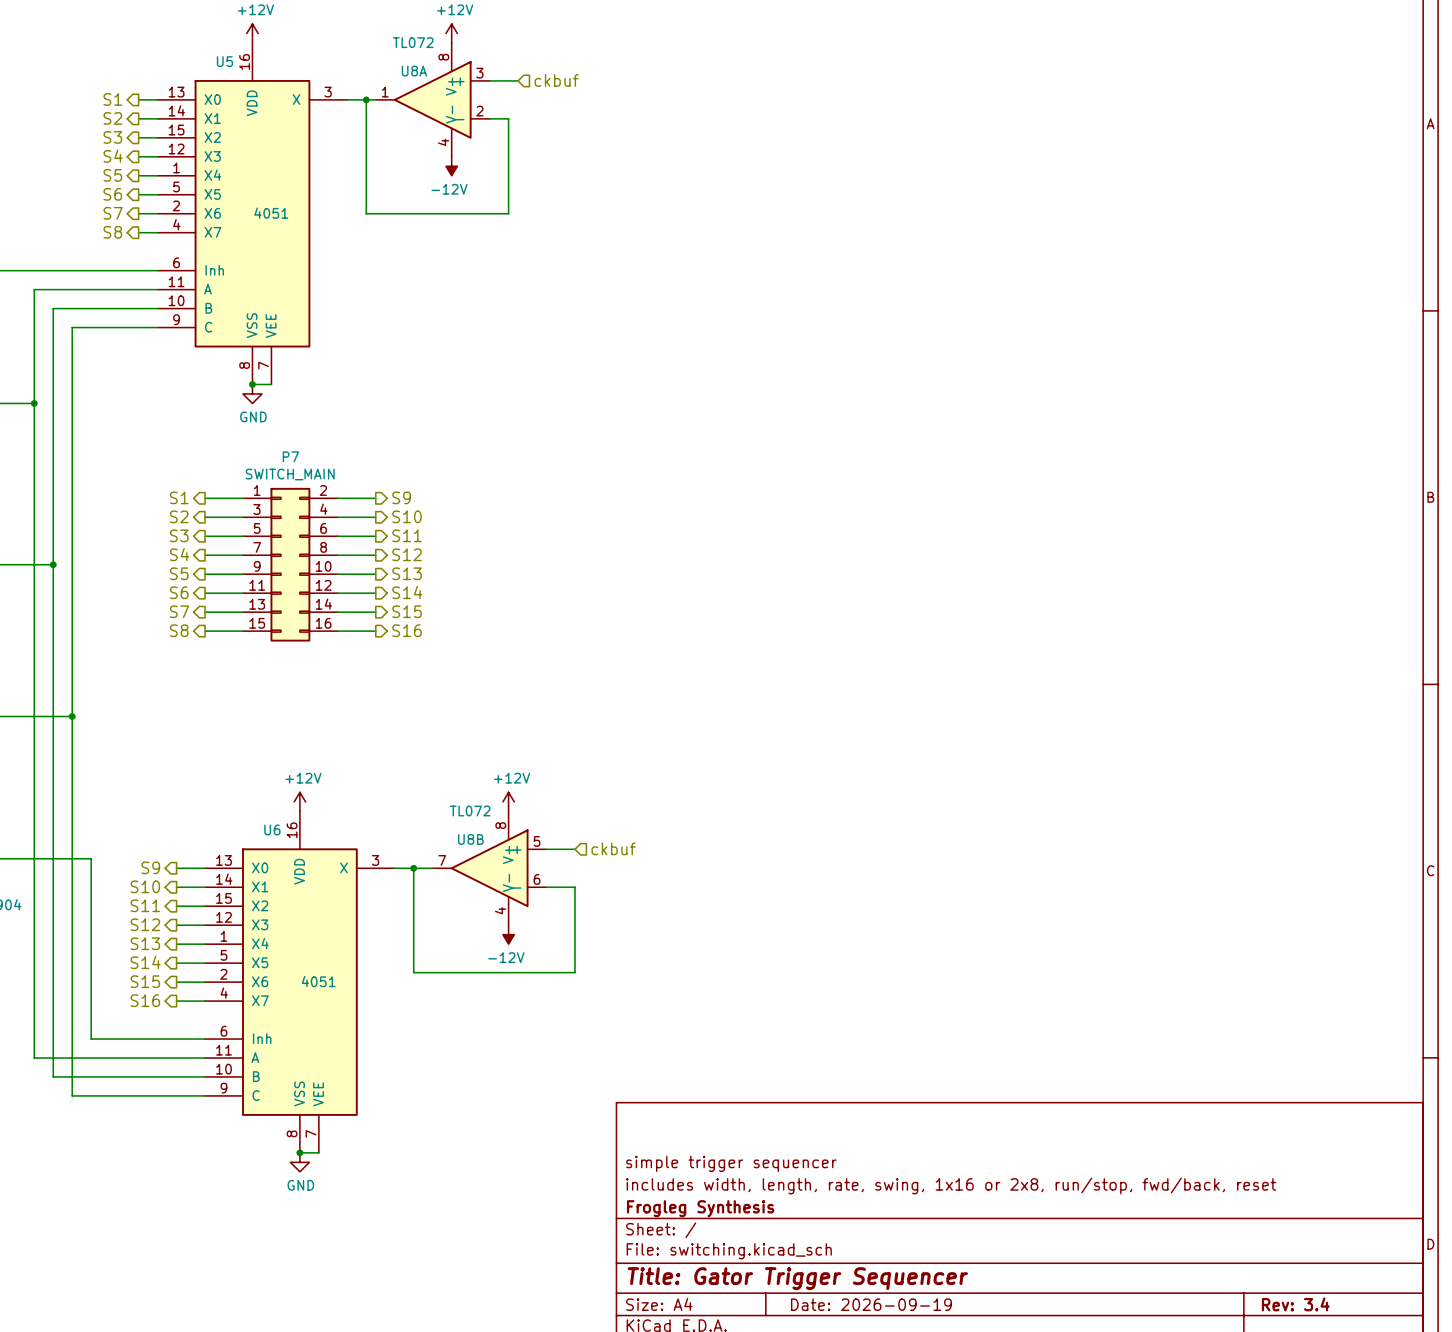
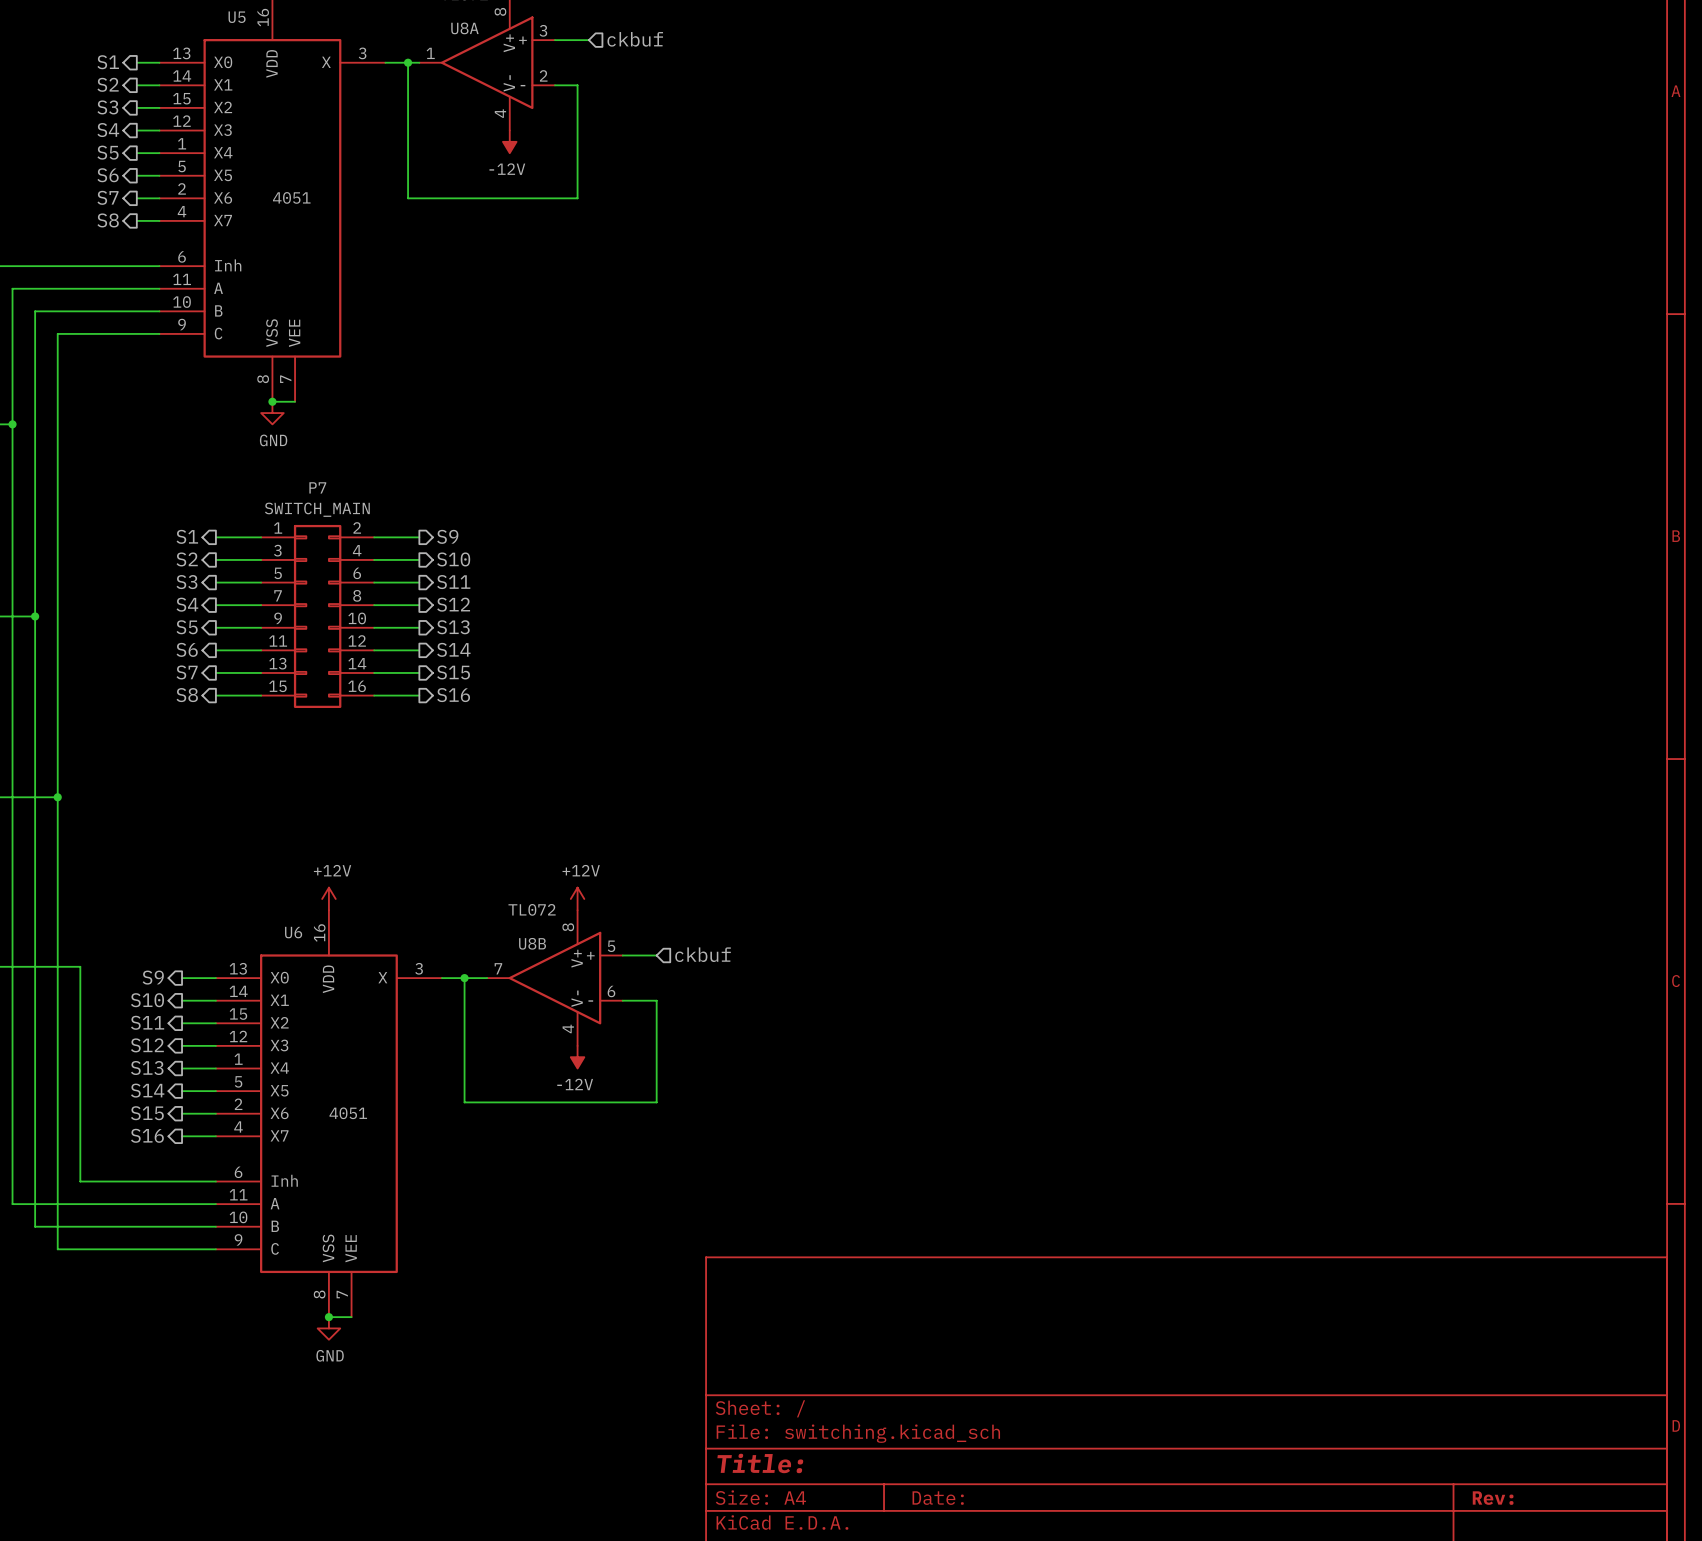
title block: simple trigger sequencer (731, 1163) -> none
title block: includes width, length, rate, swing, 1x16 or 2x8, run/stop, fwd/back, reset (951, 1186) -> none
title block: Frogleg Synthesis (700, 1208) -> none
title block: Title: Gator Trigger Sequencer (797, 1278) -> Title: (760, 1463)
title block: Date: 2026-09-19 (871, 1304) -> Date: (938, 1498)
title block: Rev: 3.4 (1295, 1304) -> Rev: (1493, 1498)

